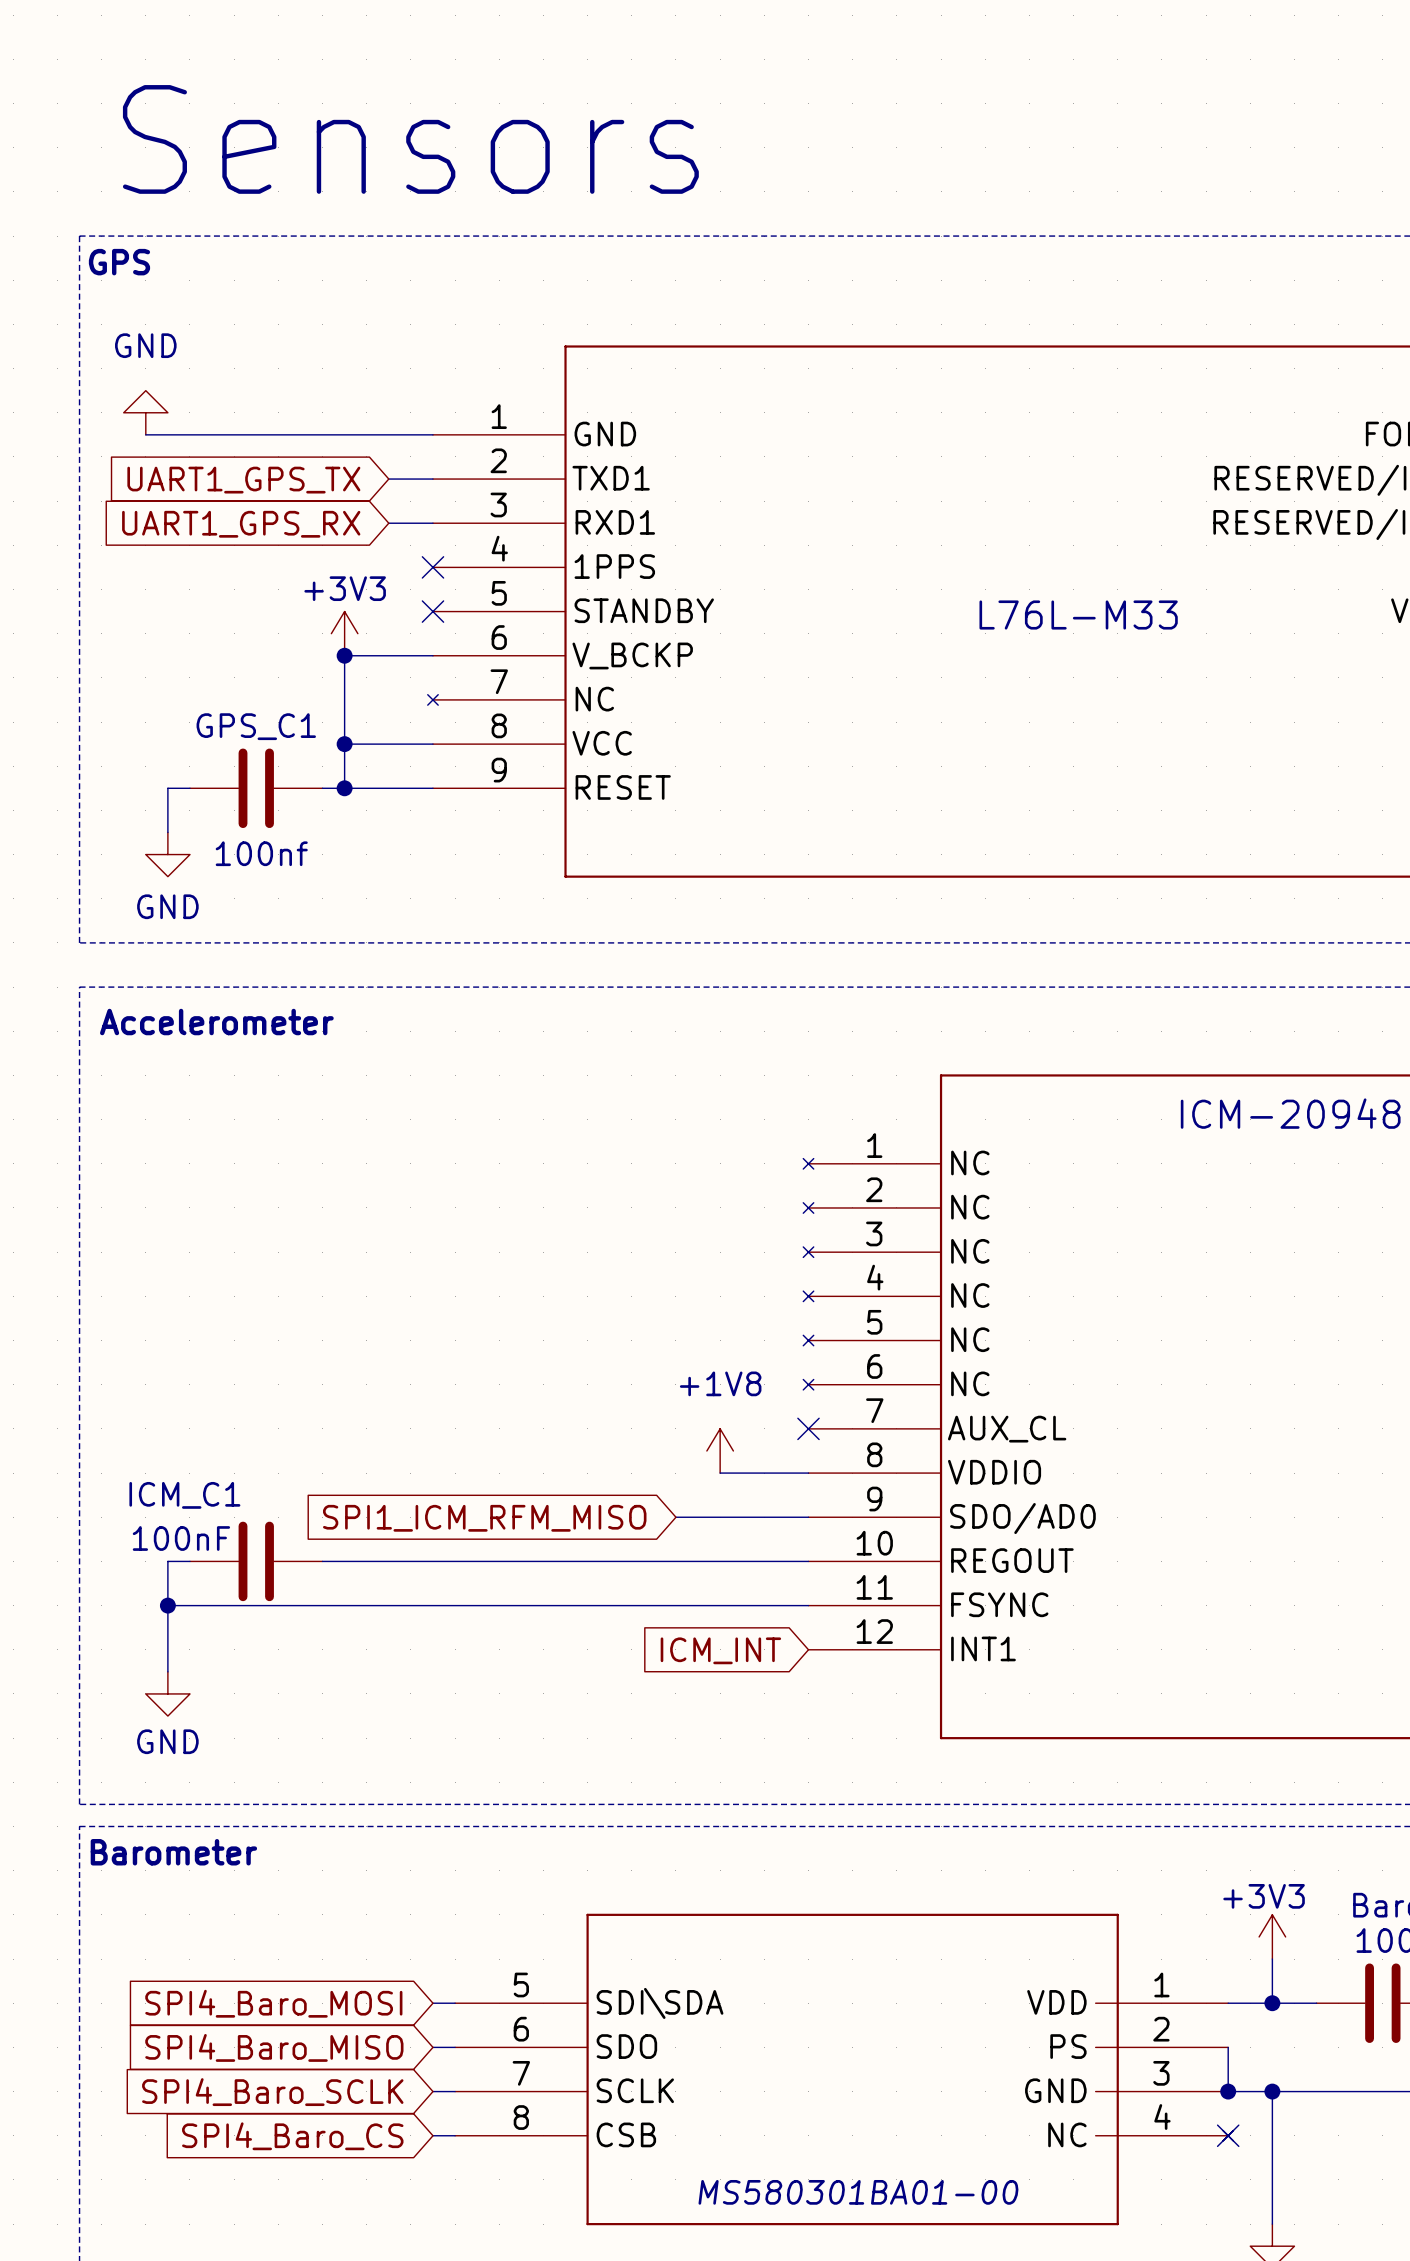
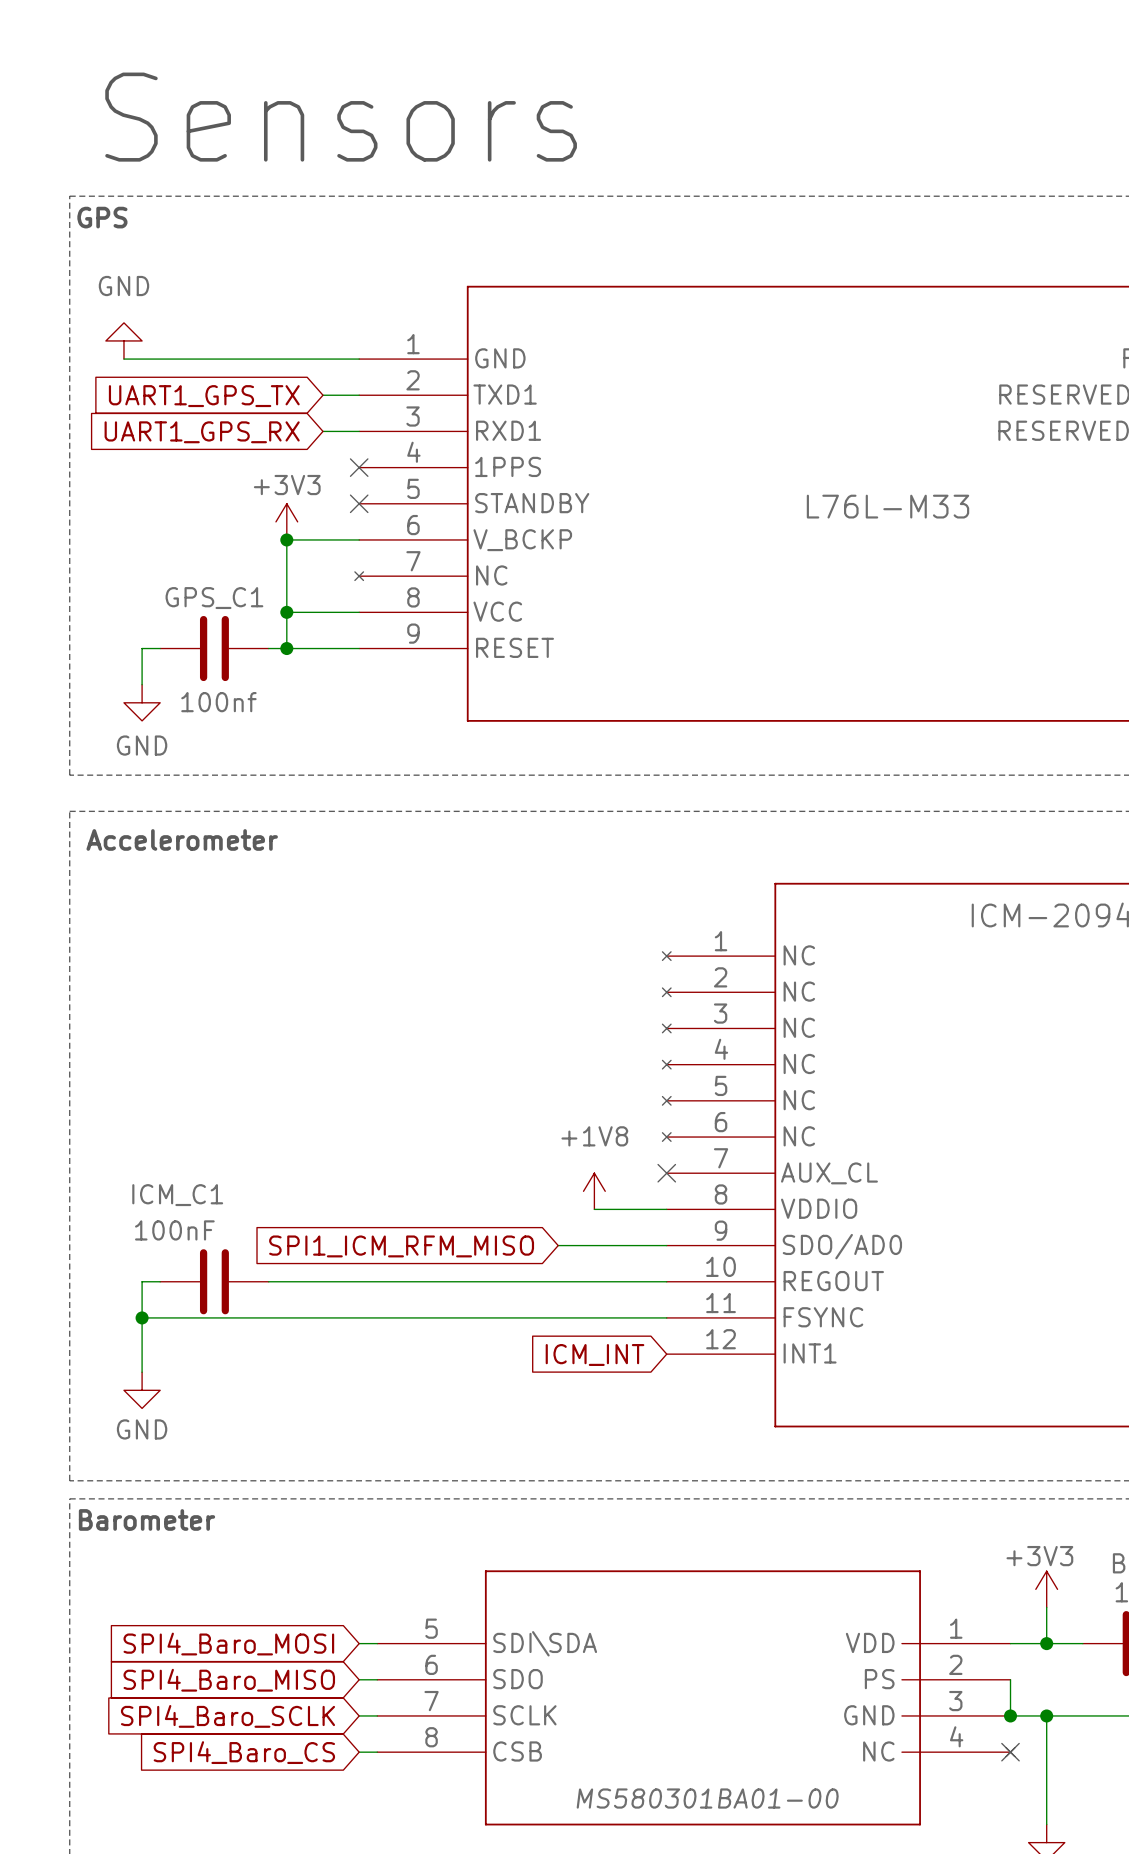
ICM_C1 name position: ICM_C1 (184, 1495) -> ICM_C1 (177, 1195)
ICM_C1 value position: 100nF (181, 1538) -> 100nF (174, 1230)

